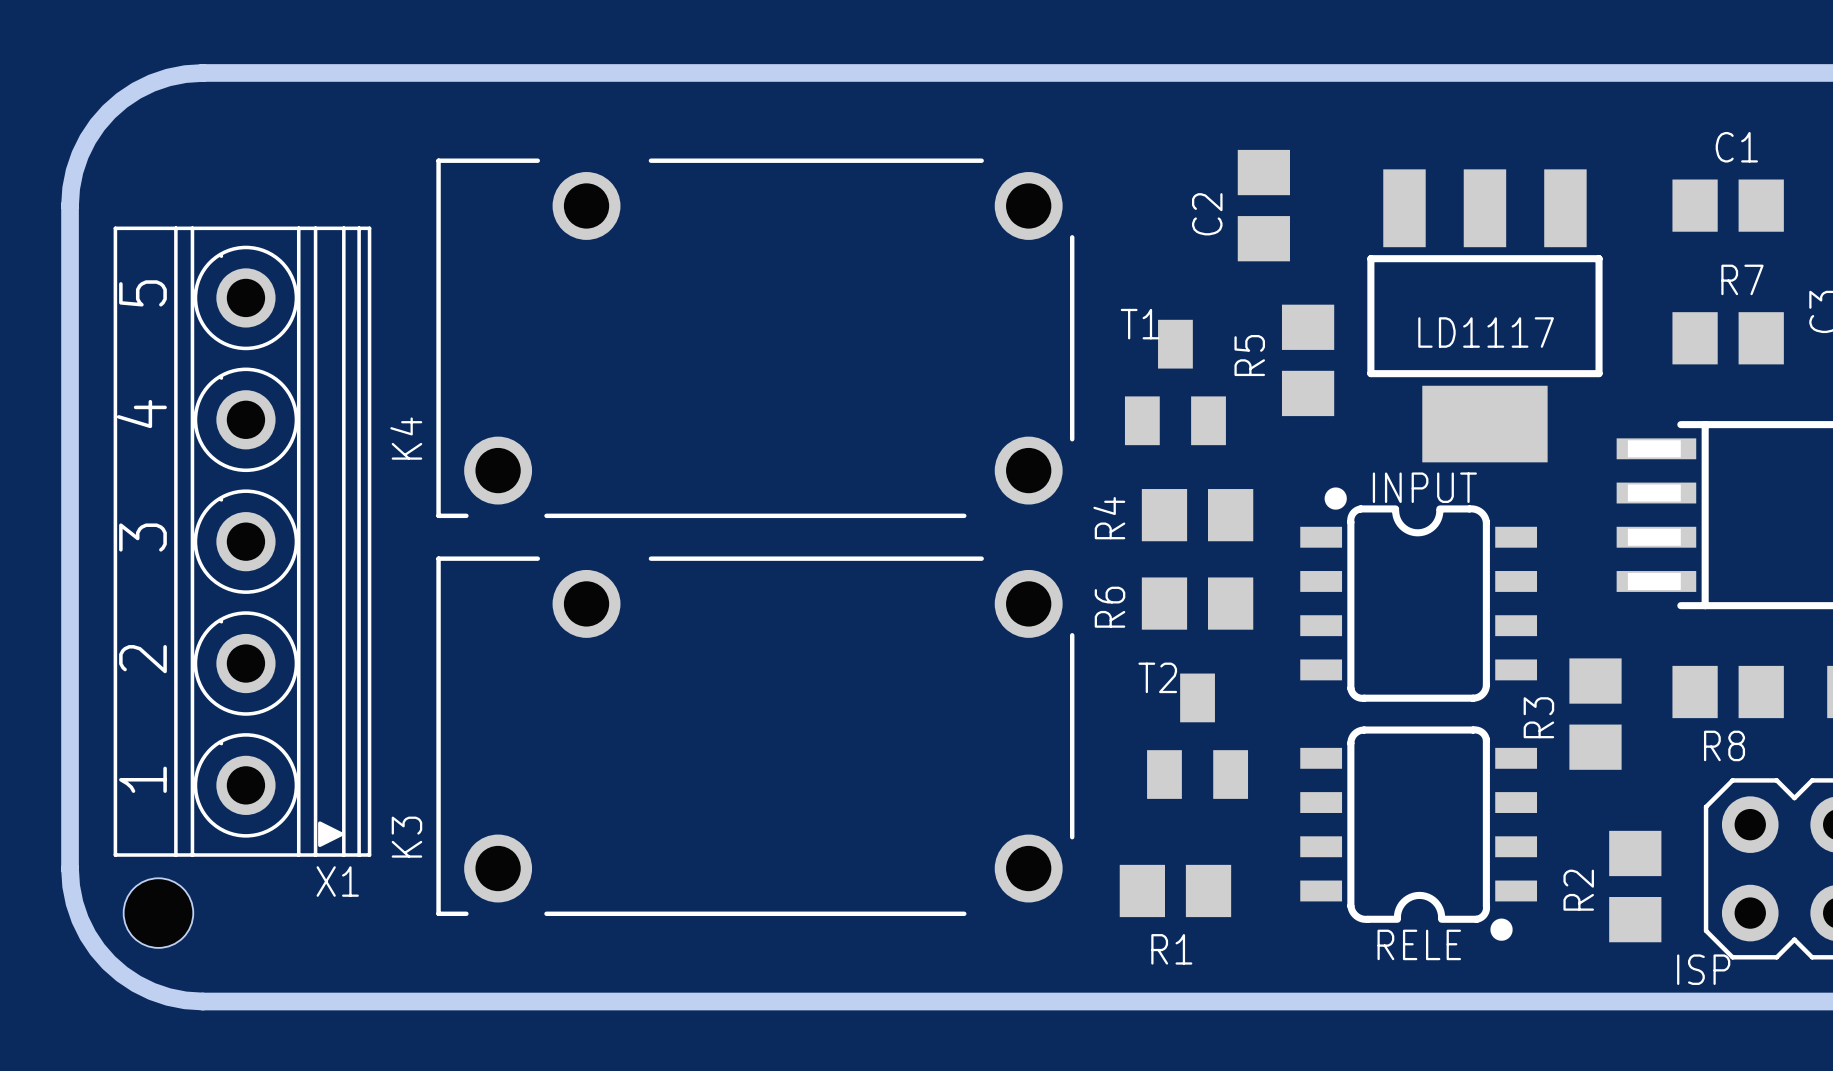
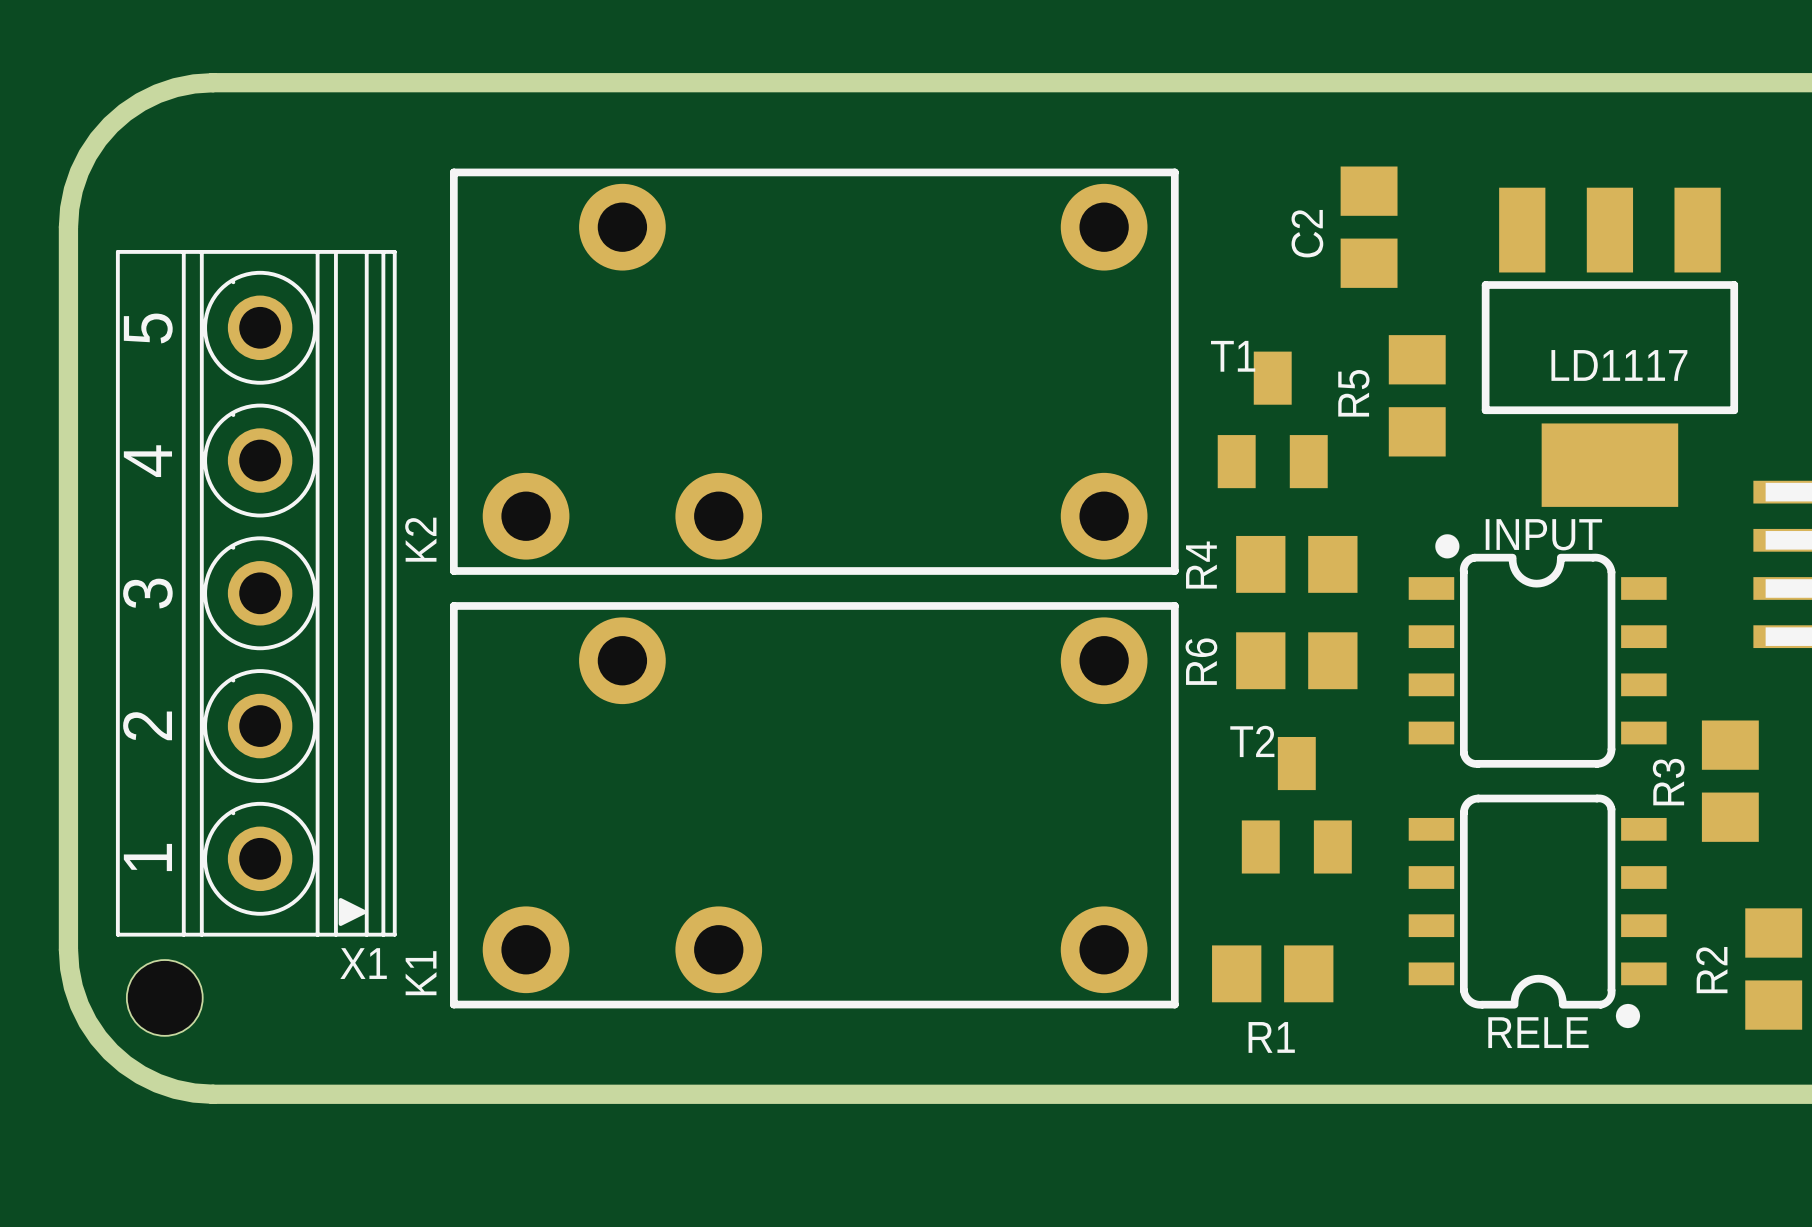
K2: none -> (814, 371)
K4: (755, 338) -> none
K1: none -> (814, 805)
K3: (755, 736) -> none

